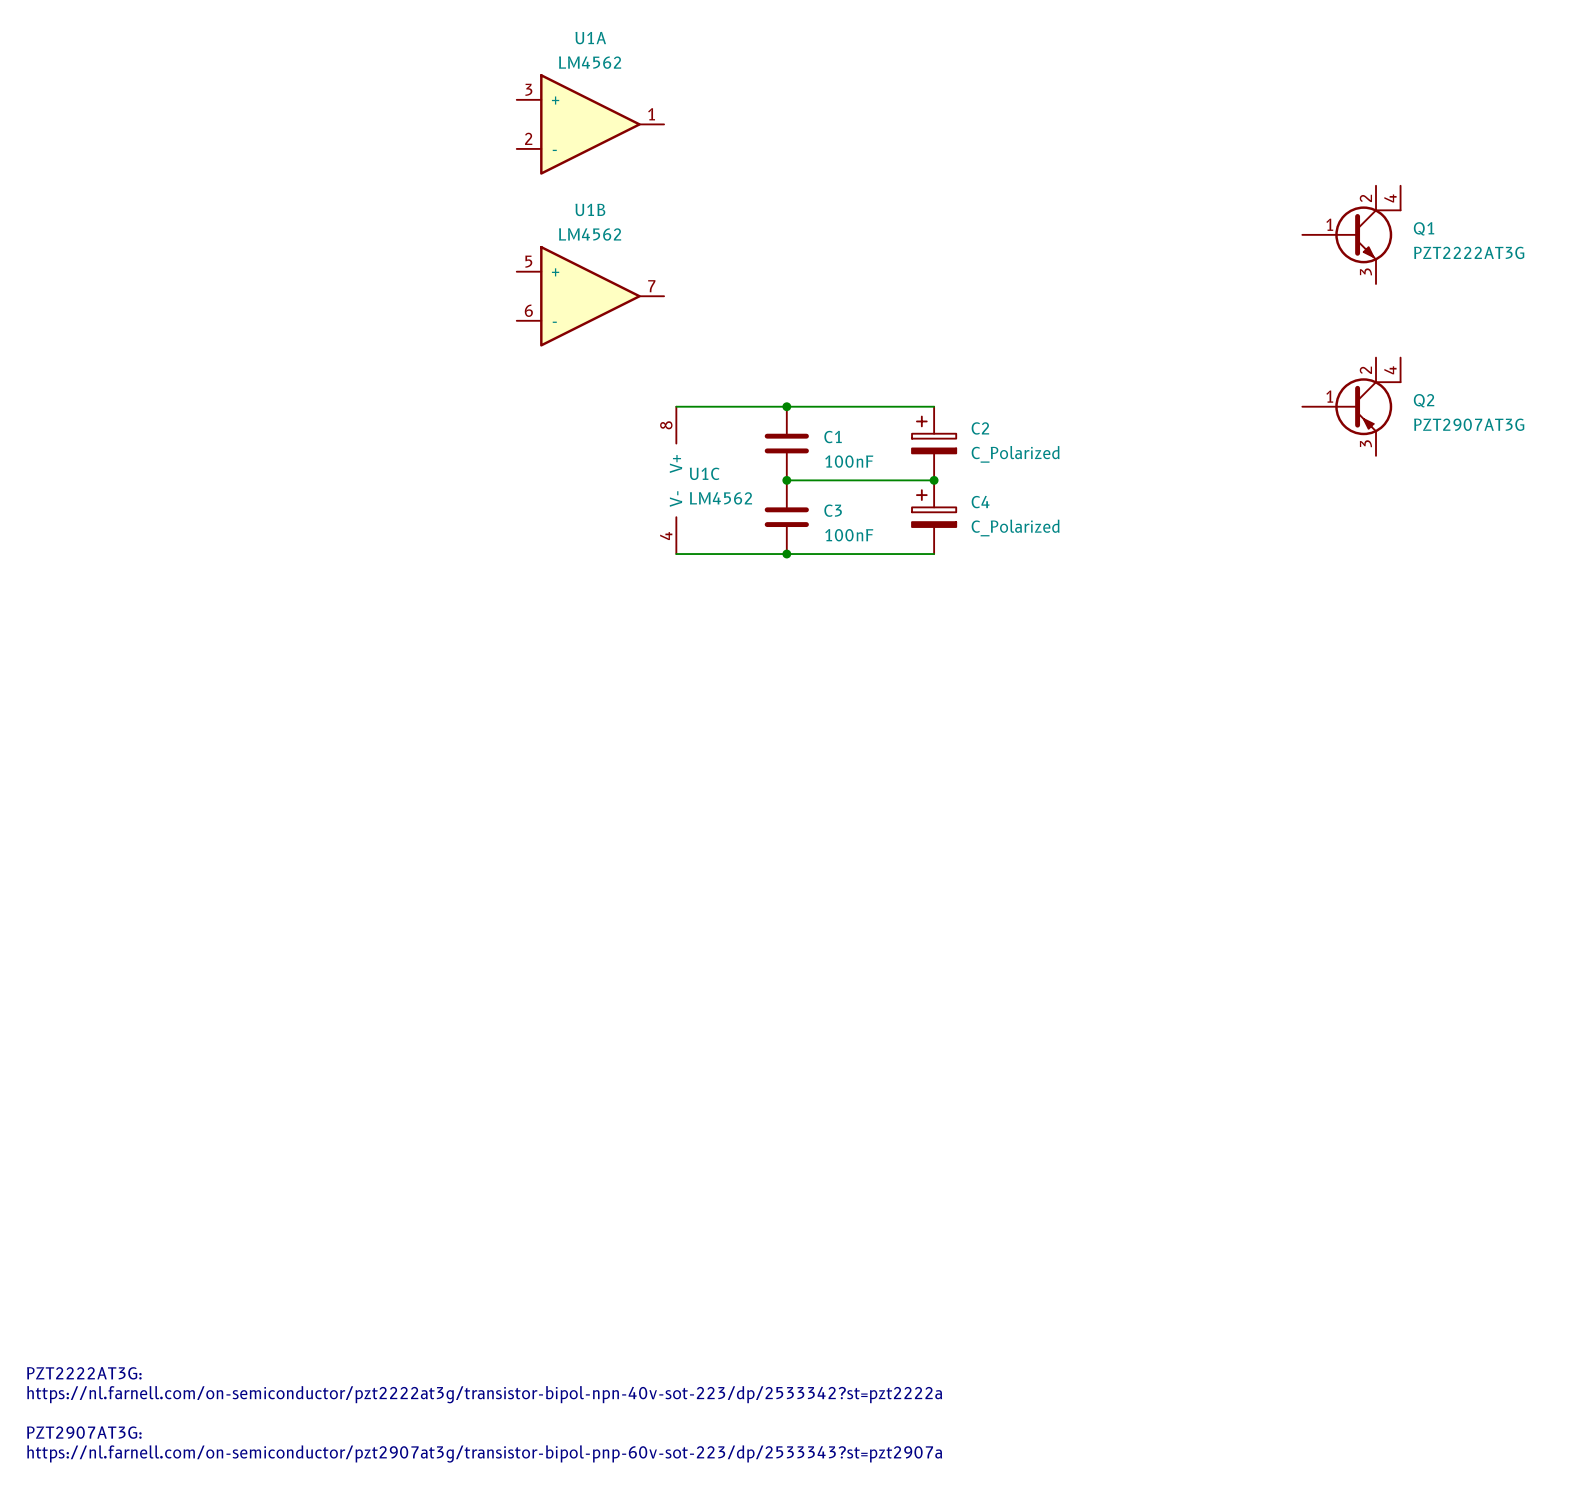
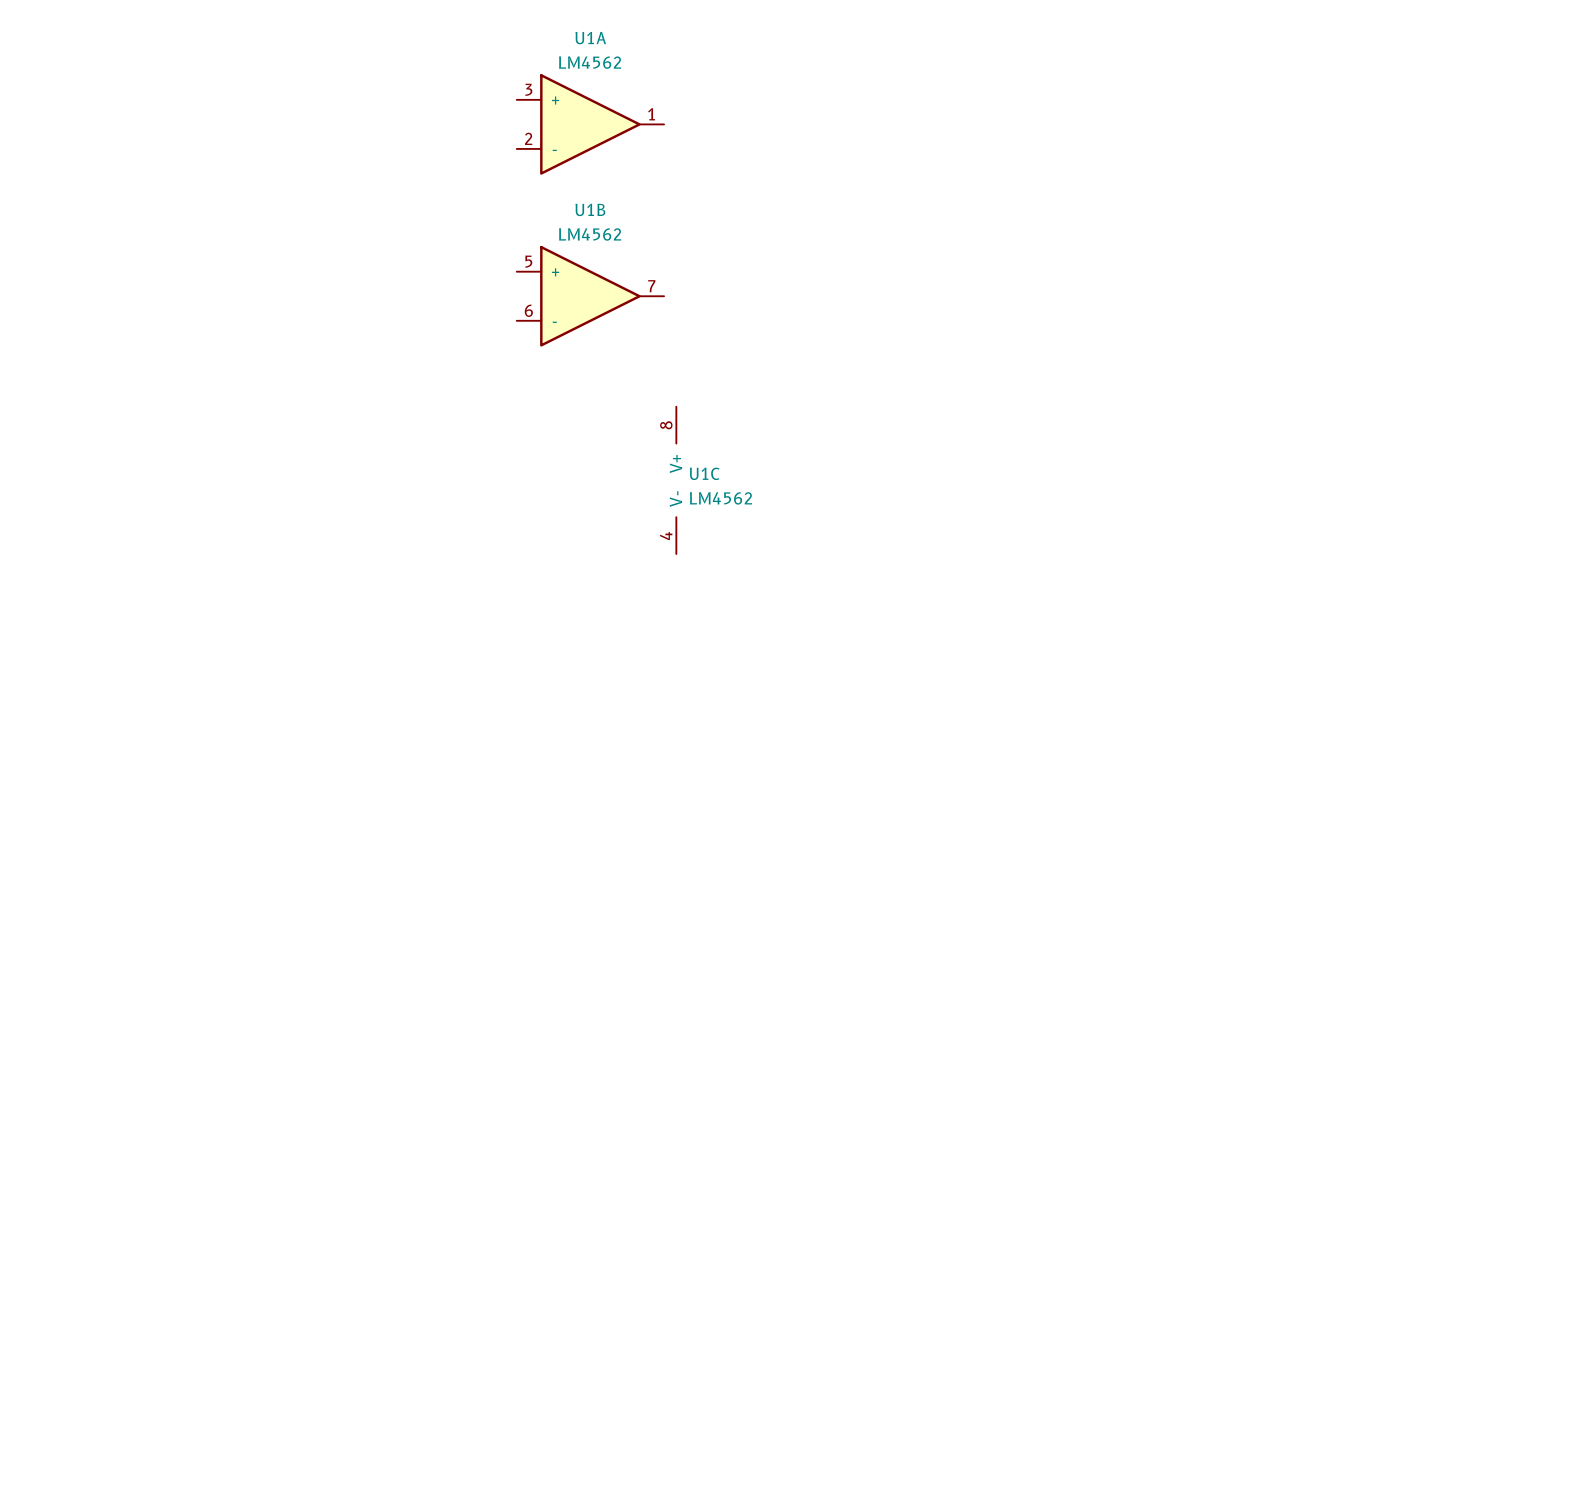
Q1: PZT2222AT3G (1351, 234) -> none
wire: (676, 406) (934, 406) -> none
junction: (786, 406) -> none
Q2: PZT2907AT3G (1351, 406) -> none
C1: 100nF (786, 443) -> none
C2: C_Polarized (934, 443) -> none
wire: (786, 480) (934, 480) -> none
junction: (786, 480) -> none
junction: (934, 480) -> none
C3: 100nF (786, 517) -> none
C4: C_Polarized (934, 517) -> none
wire: (676, 554) (934, 554) -> none
junction: (786, 554) -> none
text: PZT2222AT3G: (84, 1373) -> none
text: https://nl.farnell.com/on-semiconductor/pzt2222at3g/transistor-bipol-npn-40v-sot-223/dp/2533342?st=pzt2222a (484, 1394) -> none
text: PZT2907AT3G: (84, 1432) -> none
text: https://nl.farnell.com/on-semiconductor/pzt2907at3g/transistor-bipol-pnp-60v-sot-223/dp/2533343?st=pzt2907a (484, 1453) -> none

